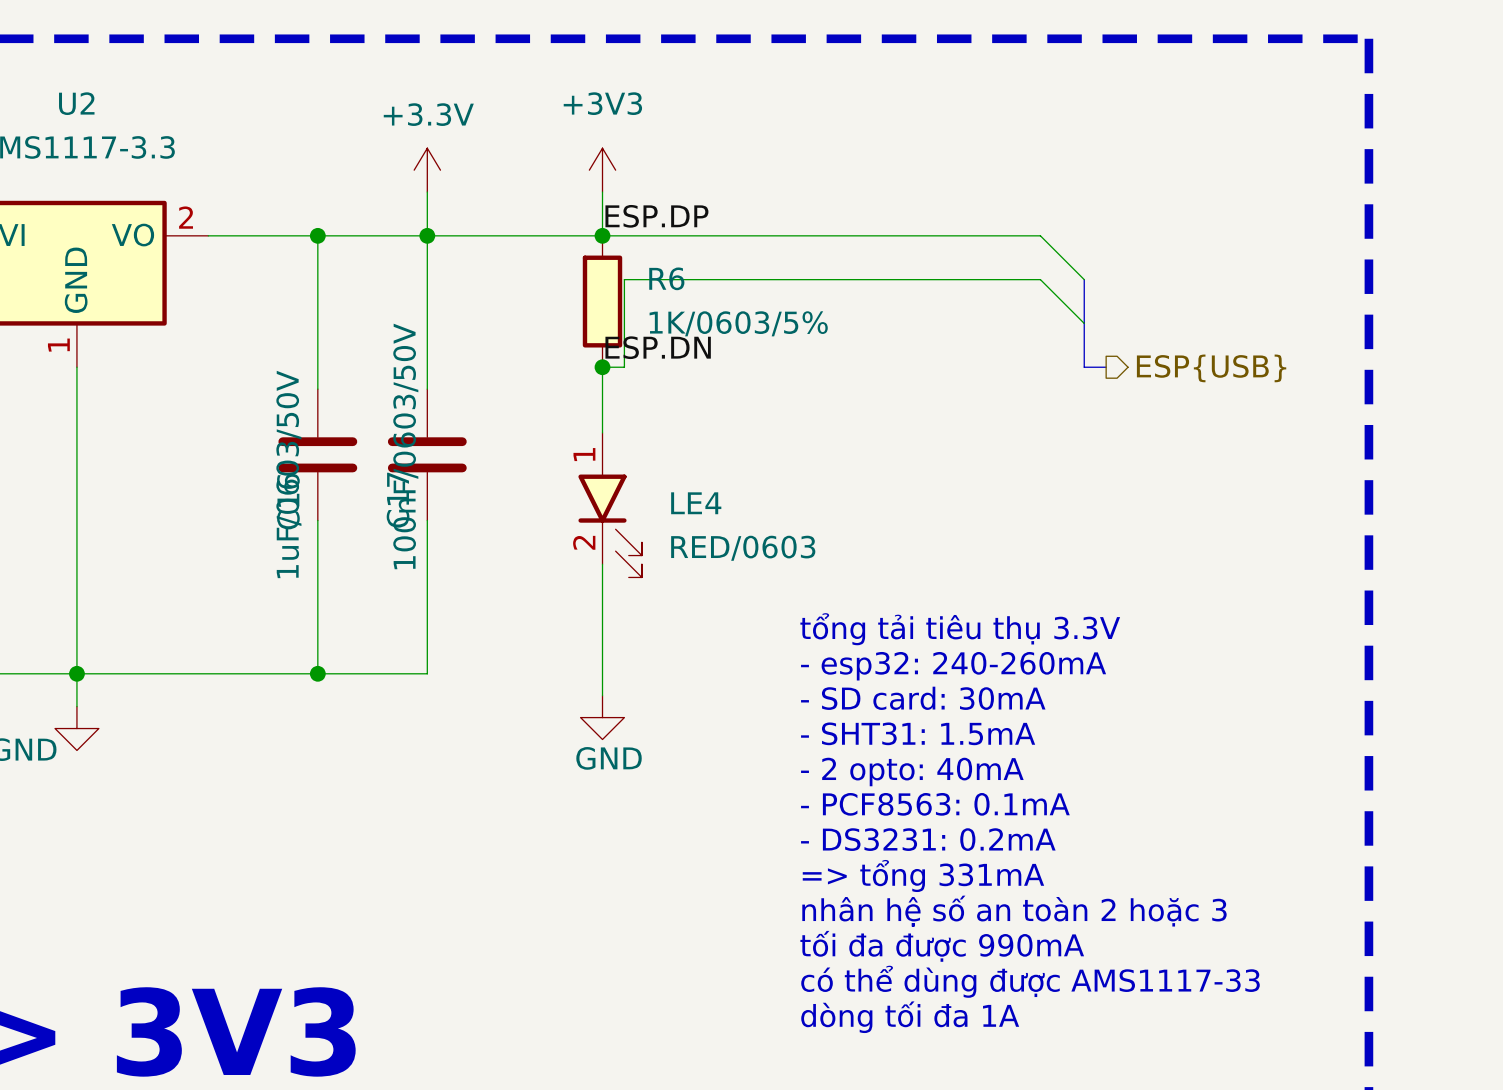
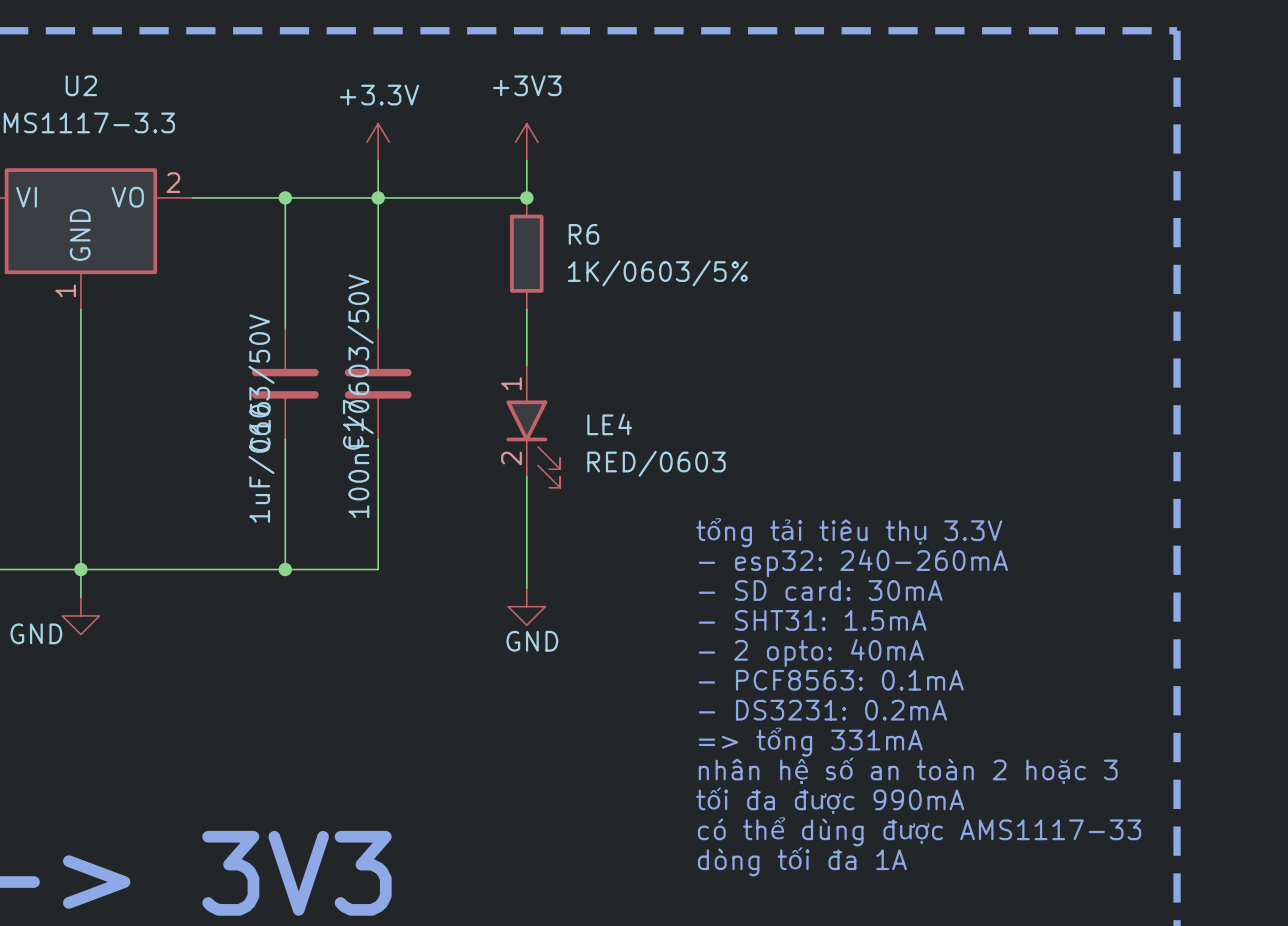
label: ESP.DP (656, 216) -> none
wire: (602, 235) (1040, 235) (1084, 279) -> none
bus: (1084, 279) (1084, 367) (1106, 367) -> none
wire: (1084, 323) (1040, 279) (624, 279) (624, 367) (602, 367) -> none
label: ESP.DN (658, 347) -> none
junction: (602, 367) -> none
hierarchical label: ESP{USB} (1211, 368) -> none

